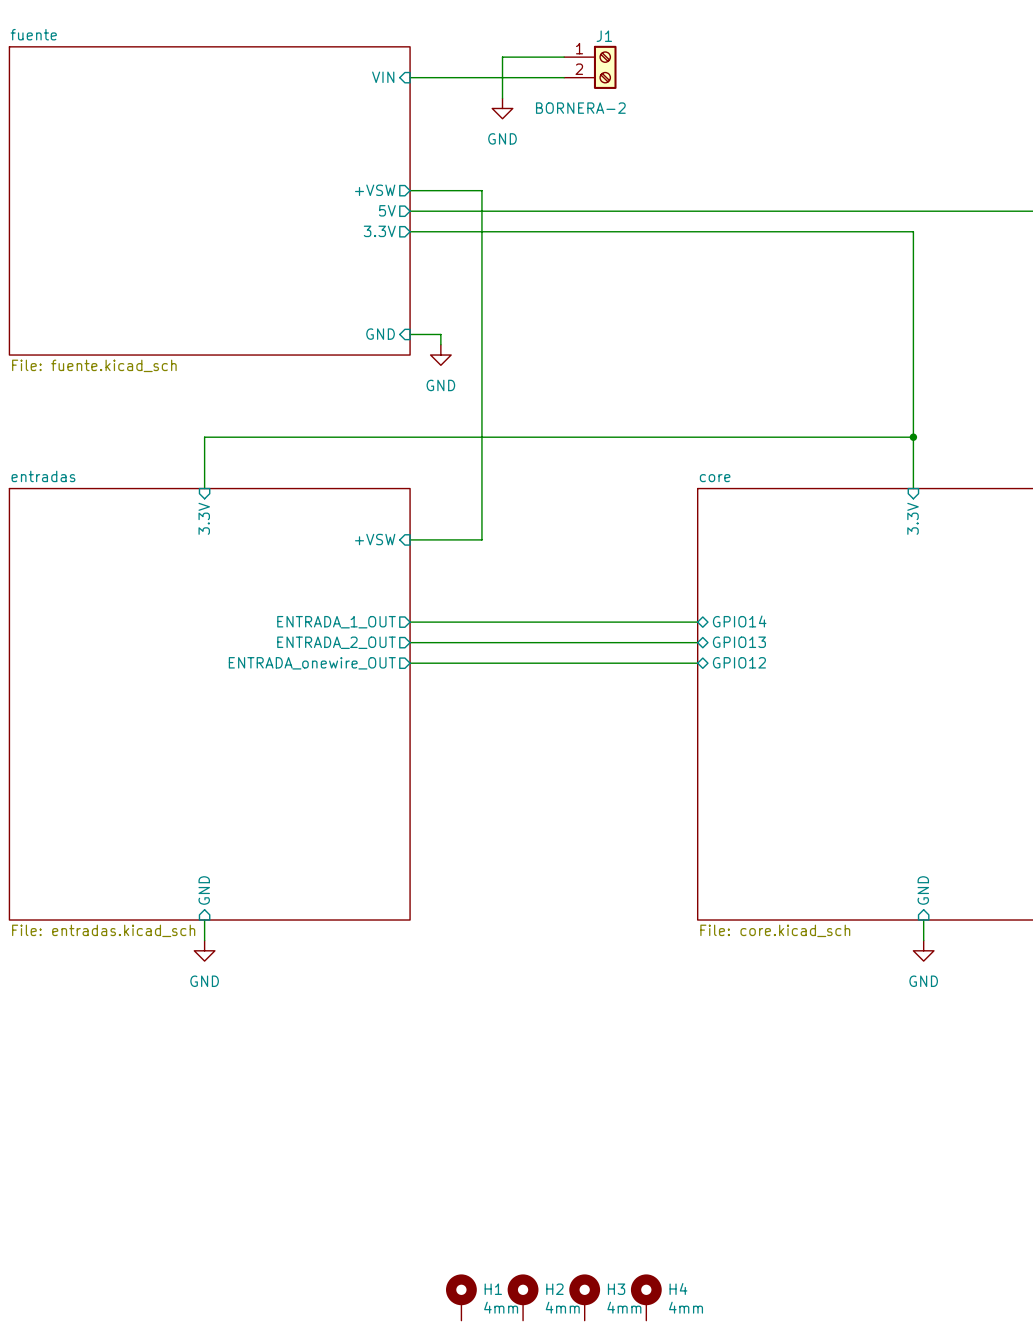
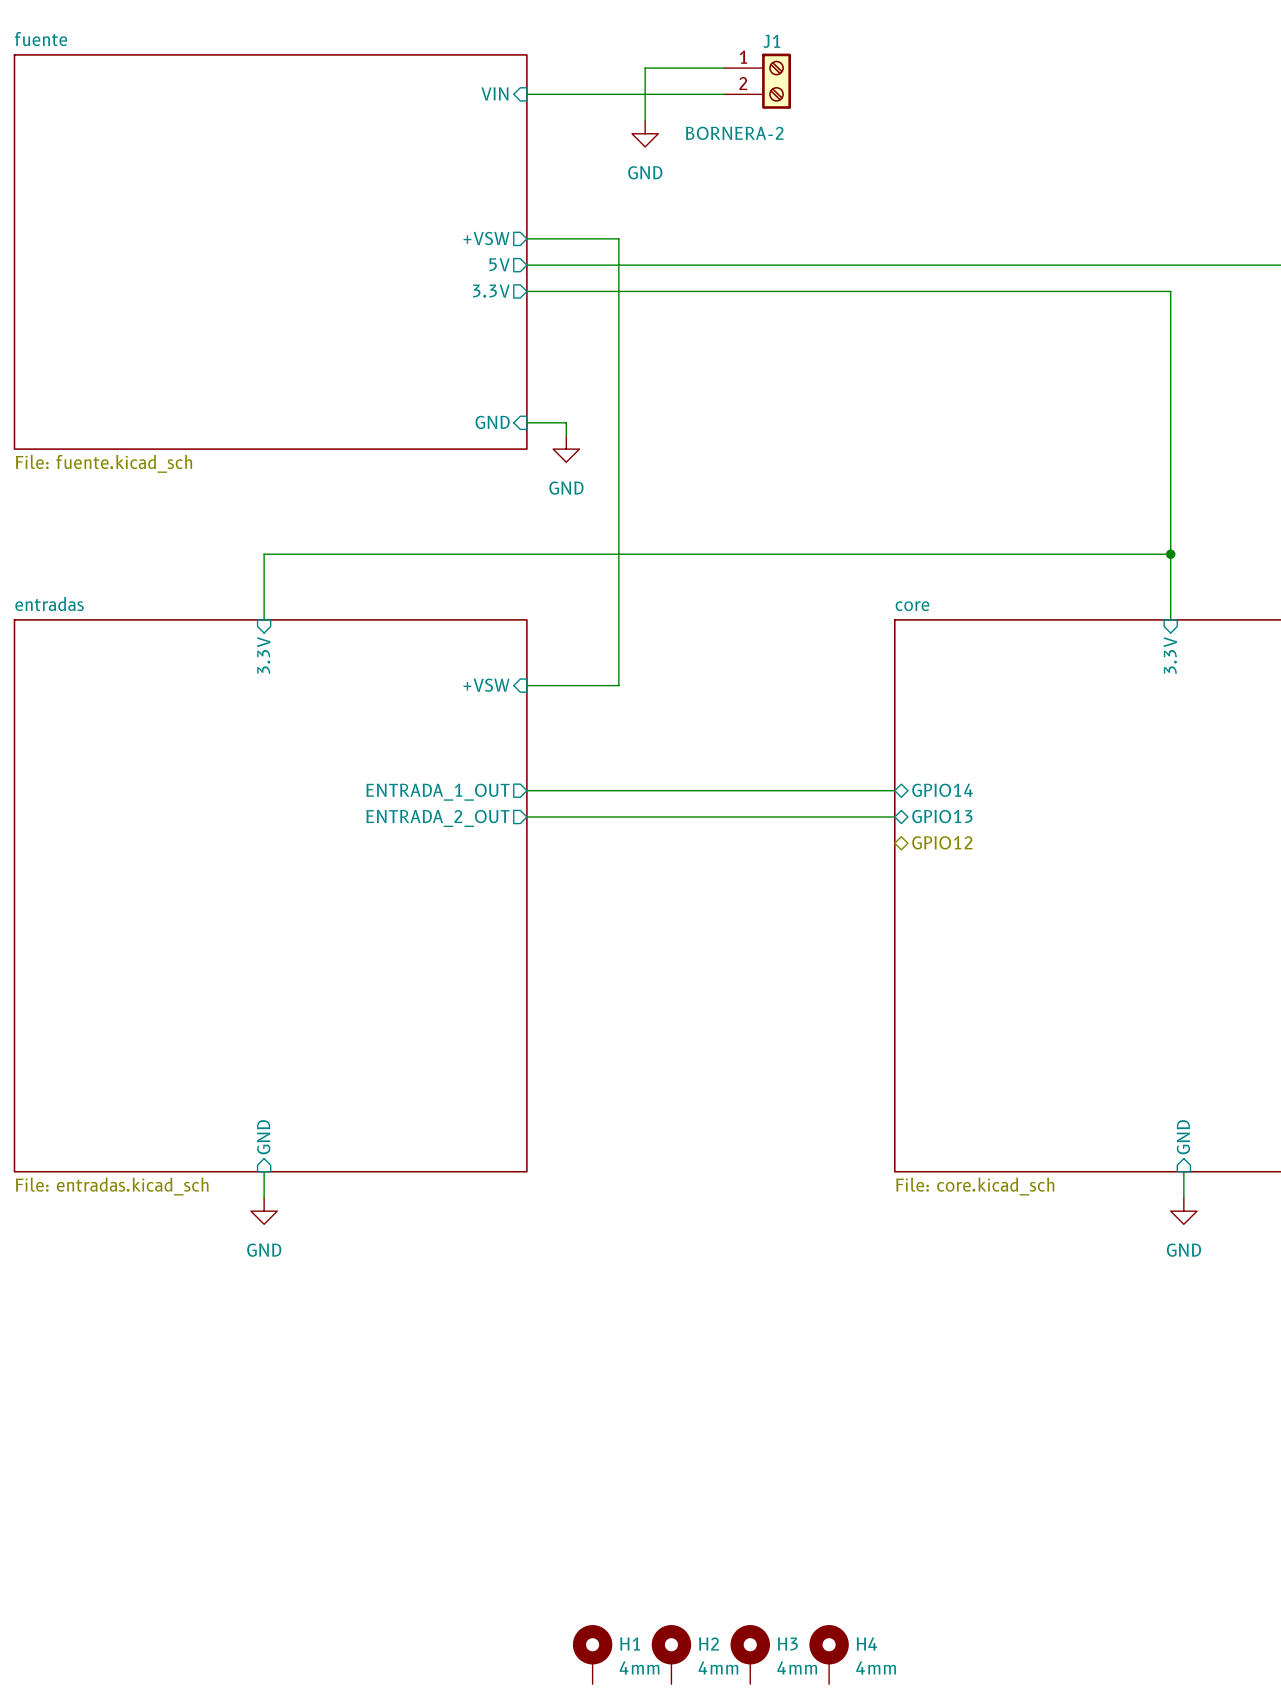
sheet pin: GPIO12 (739, 662) -> none
hierarchical label: none -> GPIO12 (942, 842)
sheet pin: ENTRADA_onewire_OUT (312, 663) -> none
wire: (410, 663) (697, 663) -> none

